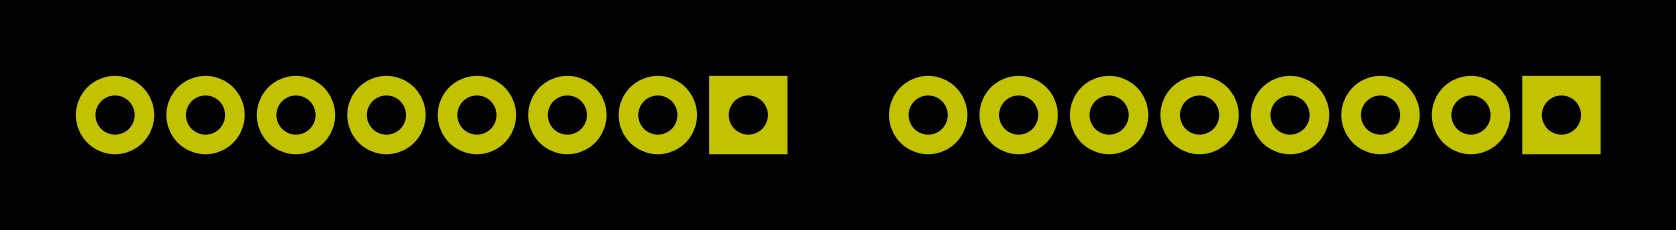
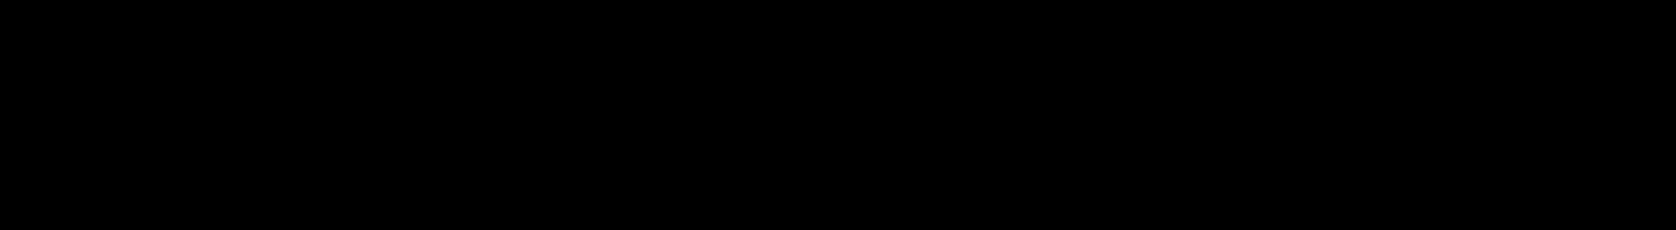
part: (431, 115) -> none
part: (1244, 115) -> none

